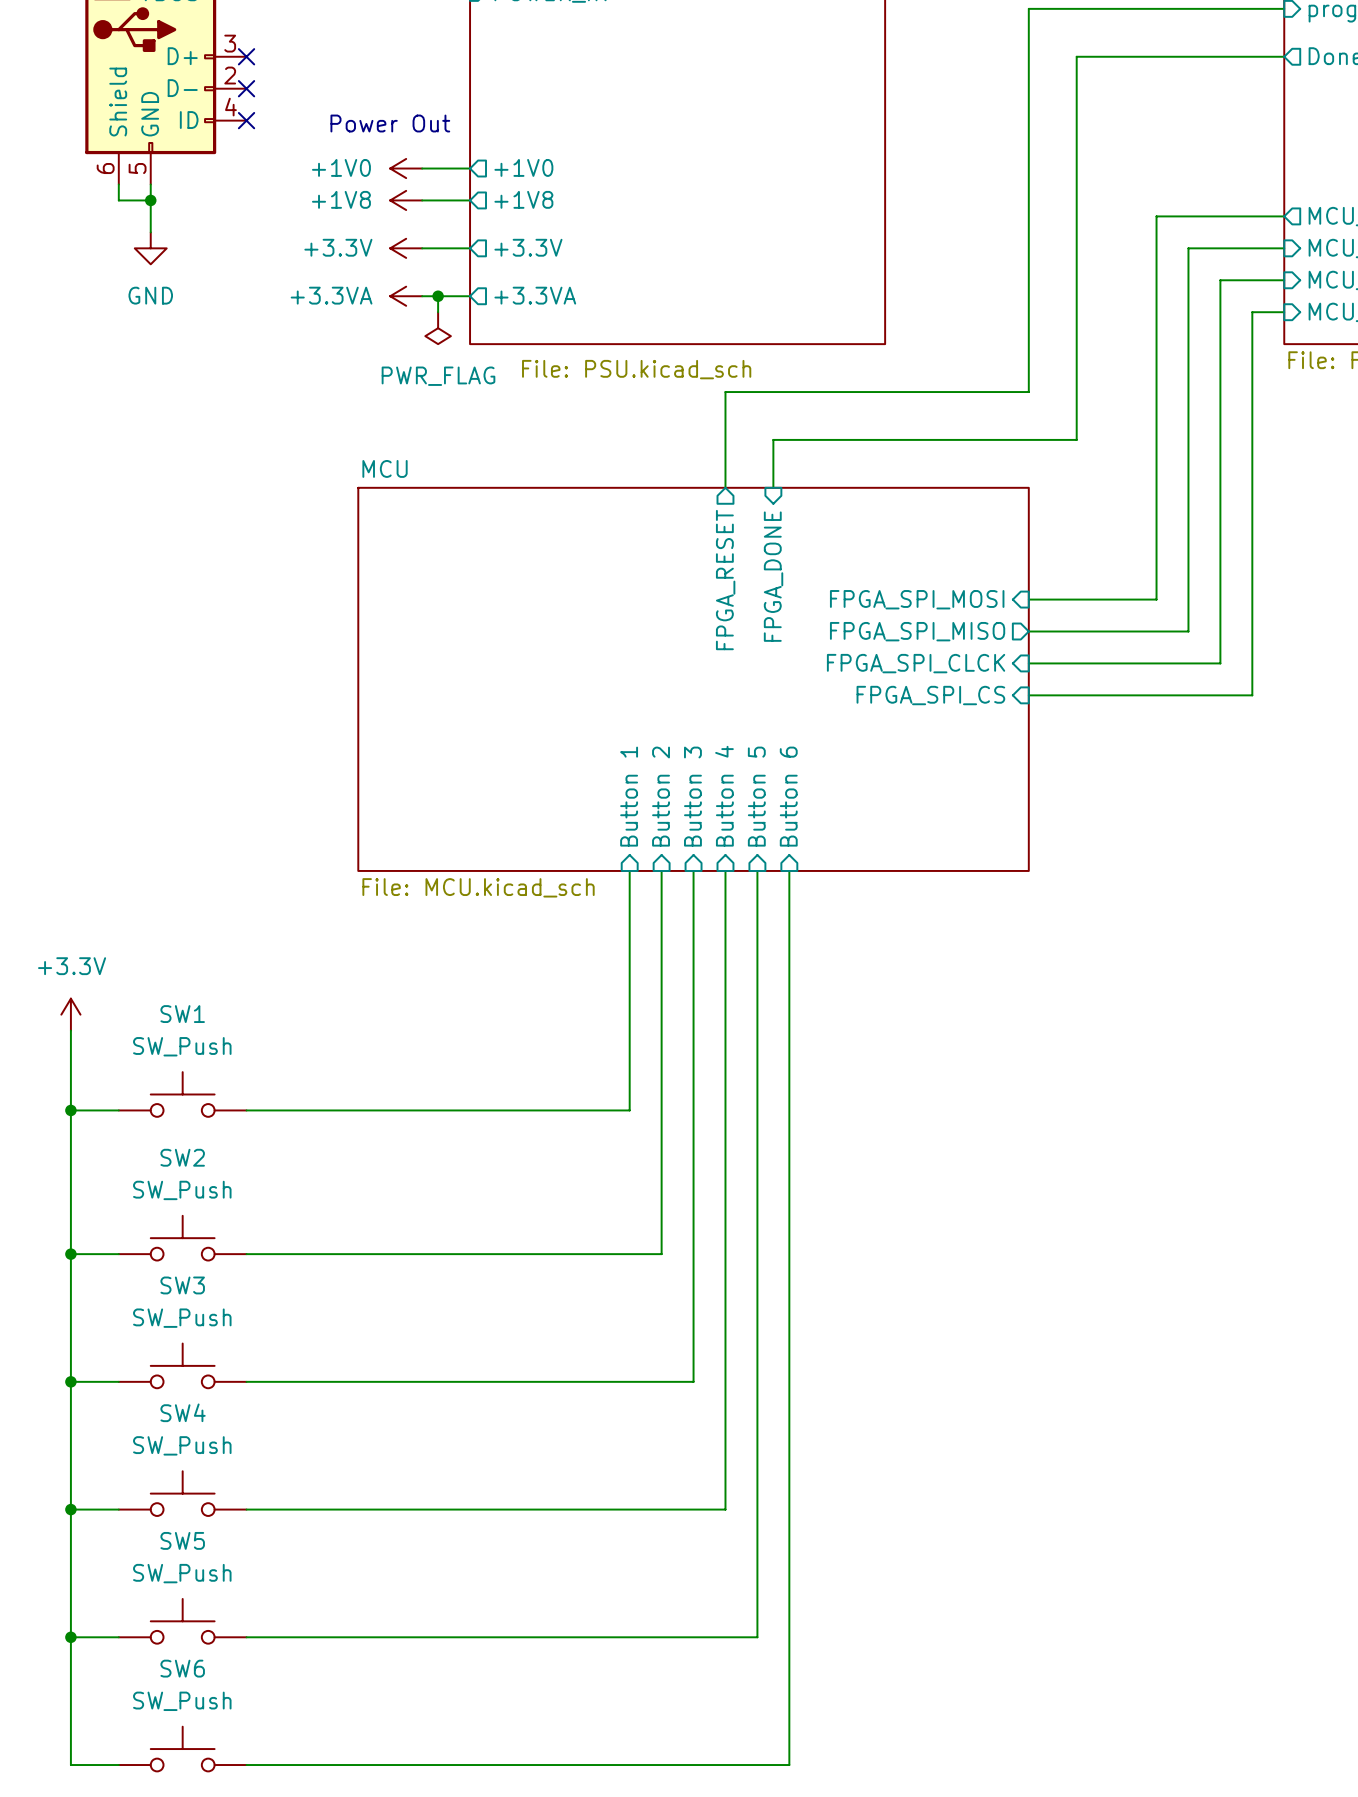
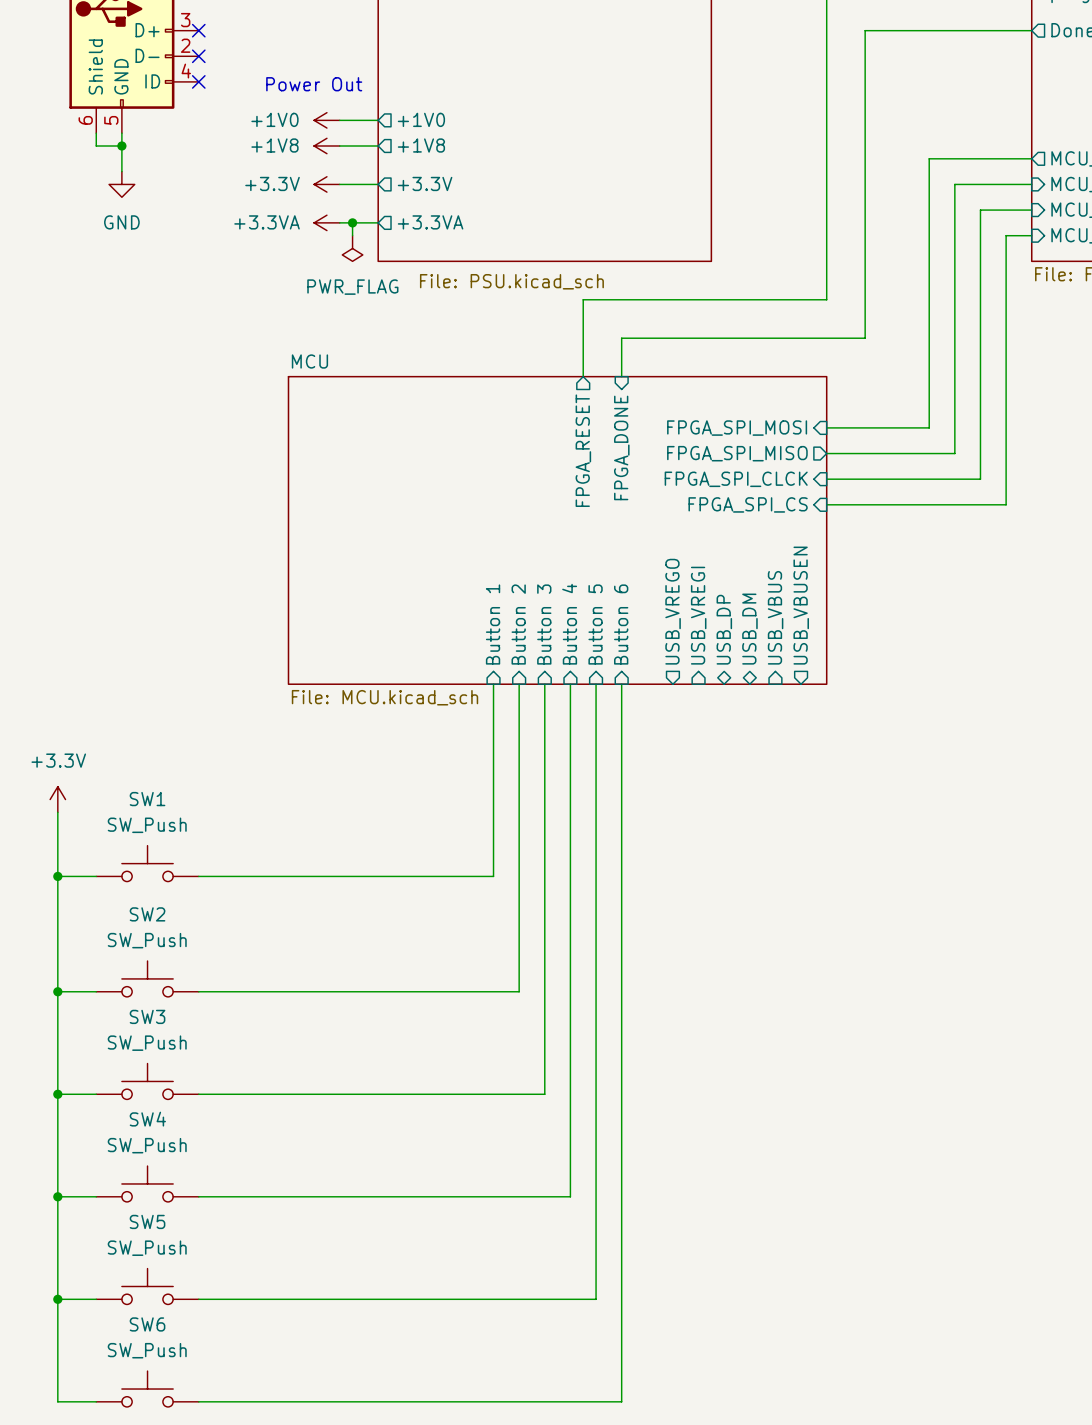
wire: (1156, 551) (1156, 599) (1028, 599) -> (929, 427) (826, 427)
wire: (1188, 583) (1188, 631) (1028, 631) -> (954, 453) (826, 453)
sheet pin position: FPGA_SPI_MOSI (917, 599) -> FPGA_SPI_MOSI (737, 428)
wire: (1220, 615) (1220, 663) (1028, 663) -> (980, 479) (826, 479)
sheet pin position: FPGA_SPI_MISO (917, 631) -> FPGA_SPI_MISO (737, 453)
wire: (1252, 647) (1252, 695) (1028, 695) -> (1006, 504) (826, 504)
sheet pin position: FPGA_SPI_CLCK (916, 663) -> FPGA_SPI_CLCK (736, 479)
sheet pin position: FPGA_SPI_CS (930, 695) -> FPGA_SPI_CS (748, 504)
sheet pin: none -> USB_VBUSEN (801, 605)
sheet pin: none -> USB_VREGO (673, 611)
sheet pin: none -> USB_VREGI (698, 615)
sheet pin: none -> USB_VBUS (775, 617)
sheet pin position: Button 1 (629, 796) -> Button 1 (493, 624)
sheet pin position: Button 2 (661, 796) -> Button 2 (518, 624)
sheet pin position: Button 3 (692, 796) -> Button 3 (544, 624)
sheet pin position: Button 4 (724, 796) -> Button 4 (569, 624)
sheet pin position: Button 5 (756, 796) -> Button 5 (595, 624)
sheet pin position: Button 6 (788, 796) -> Button 6 (621, 624)
sheet pin: none -> USB_DM (749, 629)
sheet pin: none -> USB_DP (724, 629)
wire: (629, 870) (629, 1110) (613, 1110) -> (493, 684) (493, 876)
wire: (661, 870) (661, 1254) (645, 1254) -> (519, 684) (519, 991)
wire: (693, 870) (693, 1381) (677, 1381) -> (544, 684) (544, 1094)
wire: (725, 870) (725, 1509) (709, 1509) -> (570, 684) (570, 1196)
wire: (757, 870) (757, 1637) (741, 1637) -> (596, 684) (596, 1299)
wire: (789, 870) (789, 1765) (773, 1765) -> (621, 684) (621, 1401)

